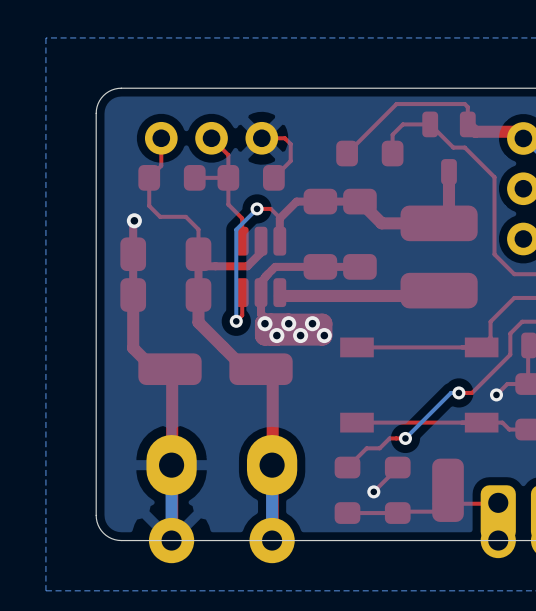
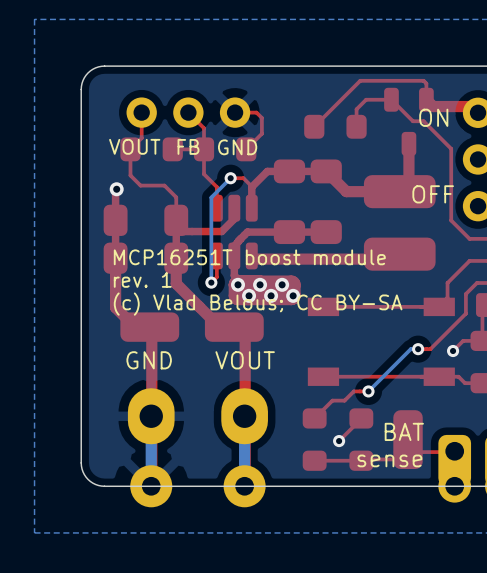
text: none -> ON (433, 117)
text: none -> VOUT (134, 146)
text: none -> FB (188, 146)
text: none -> GND (237, 147)
text: none -> OFF (433, 194)
text: none -> MCP16251T boost module (249, 257)
text: none -> rev. 1 (142, 279)
text: none -> (c) Vlad Belous; CC BY-SA (258, 304)
text: none -> GND (149, 360)
text: none -> VOUT (245, 360)
text: none -> BAT (404, 431)
text: none -> sense (389, 460)

